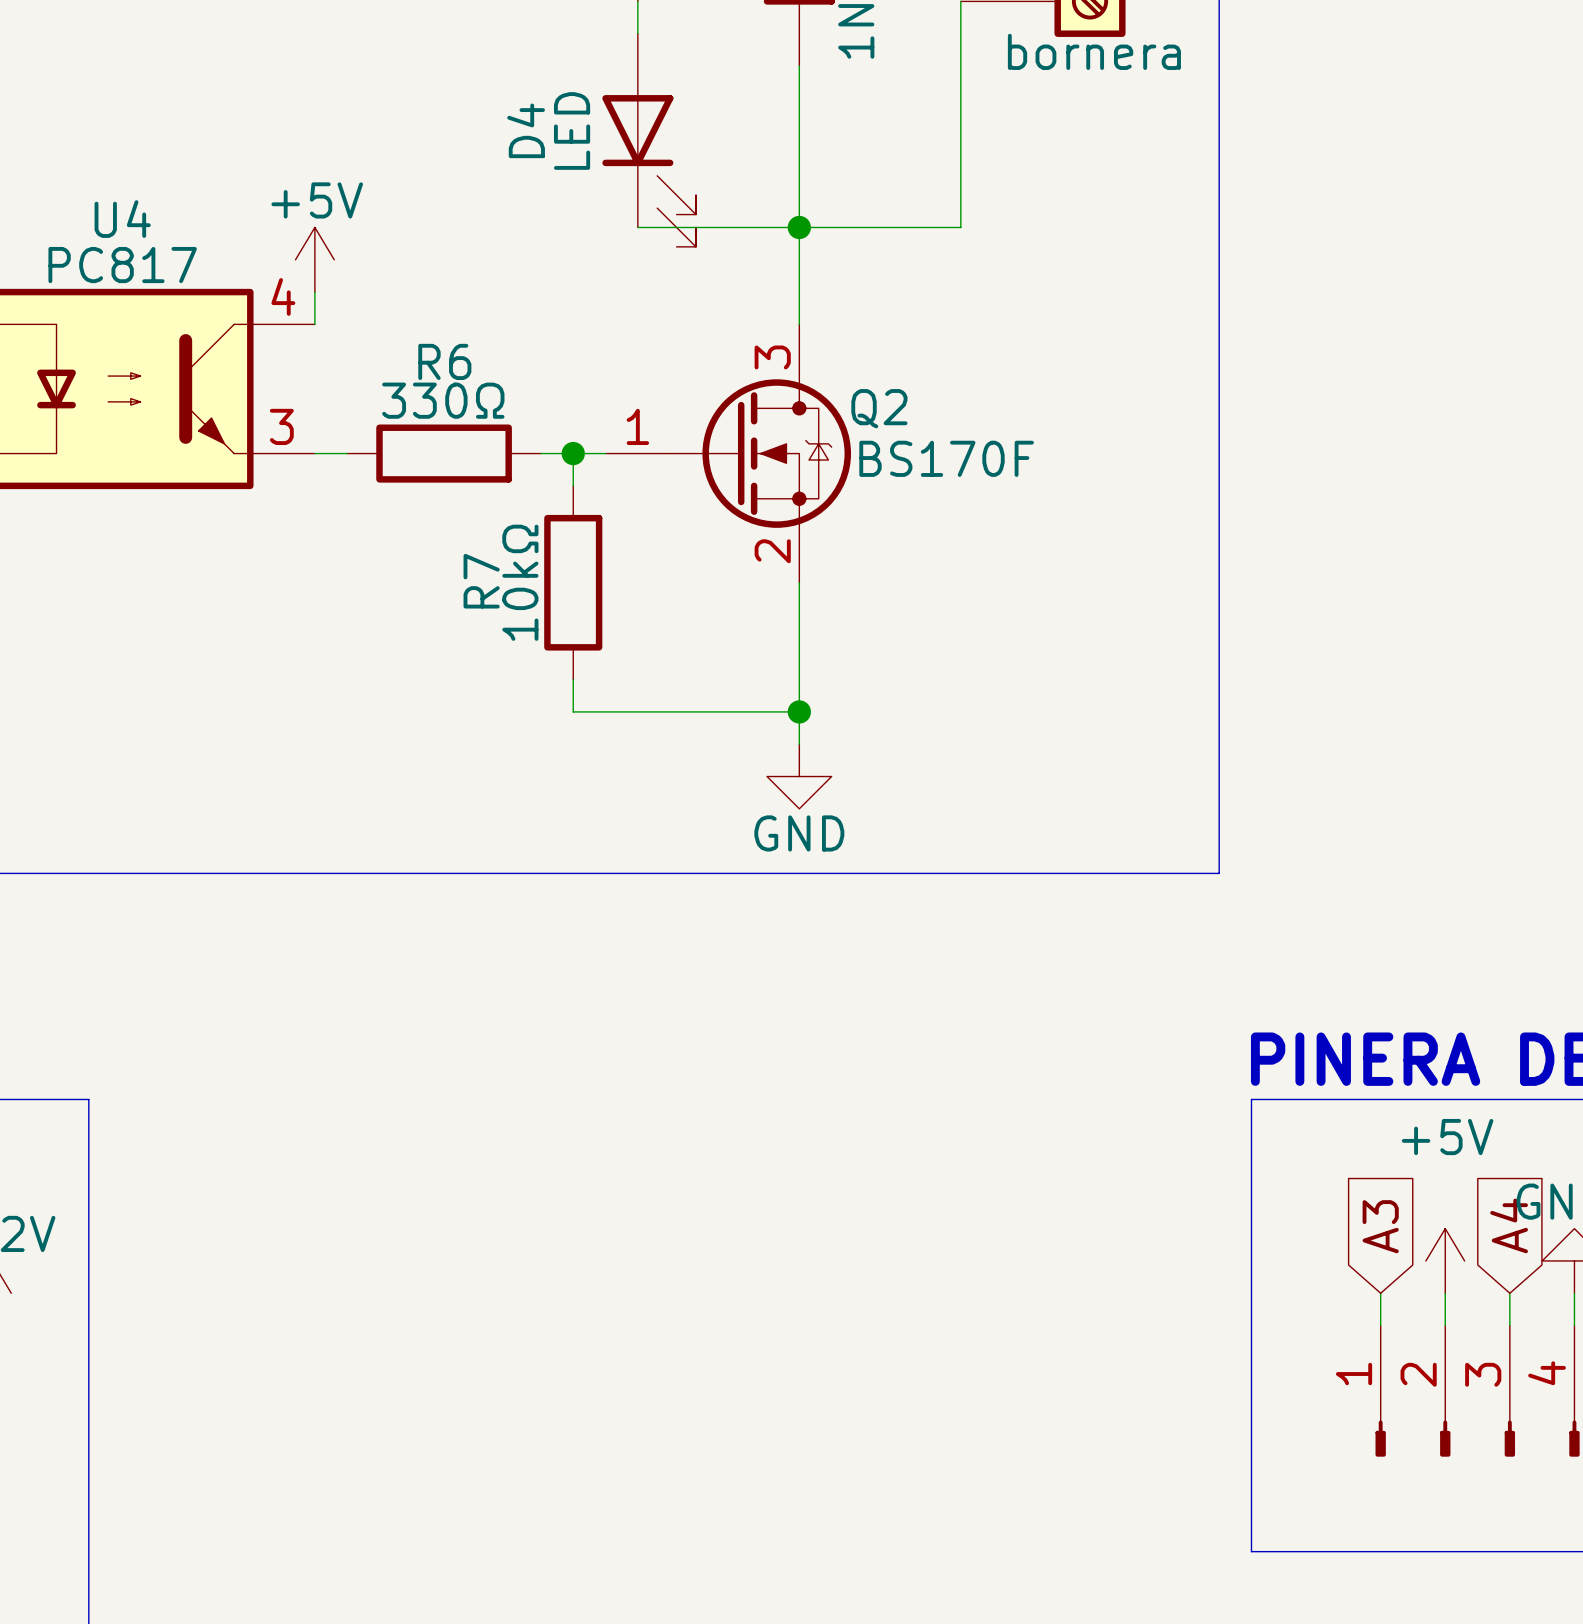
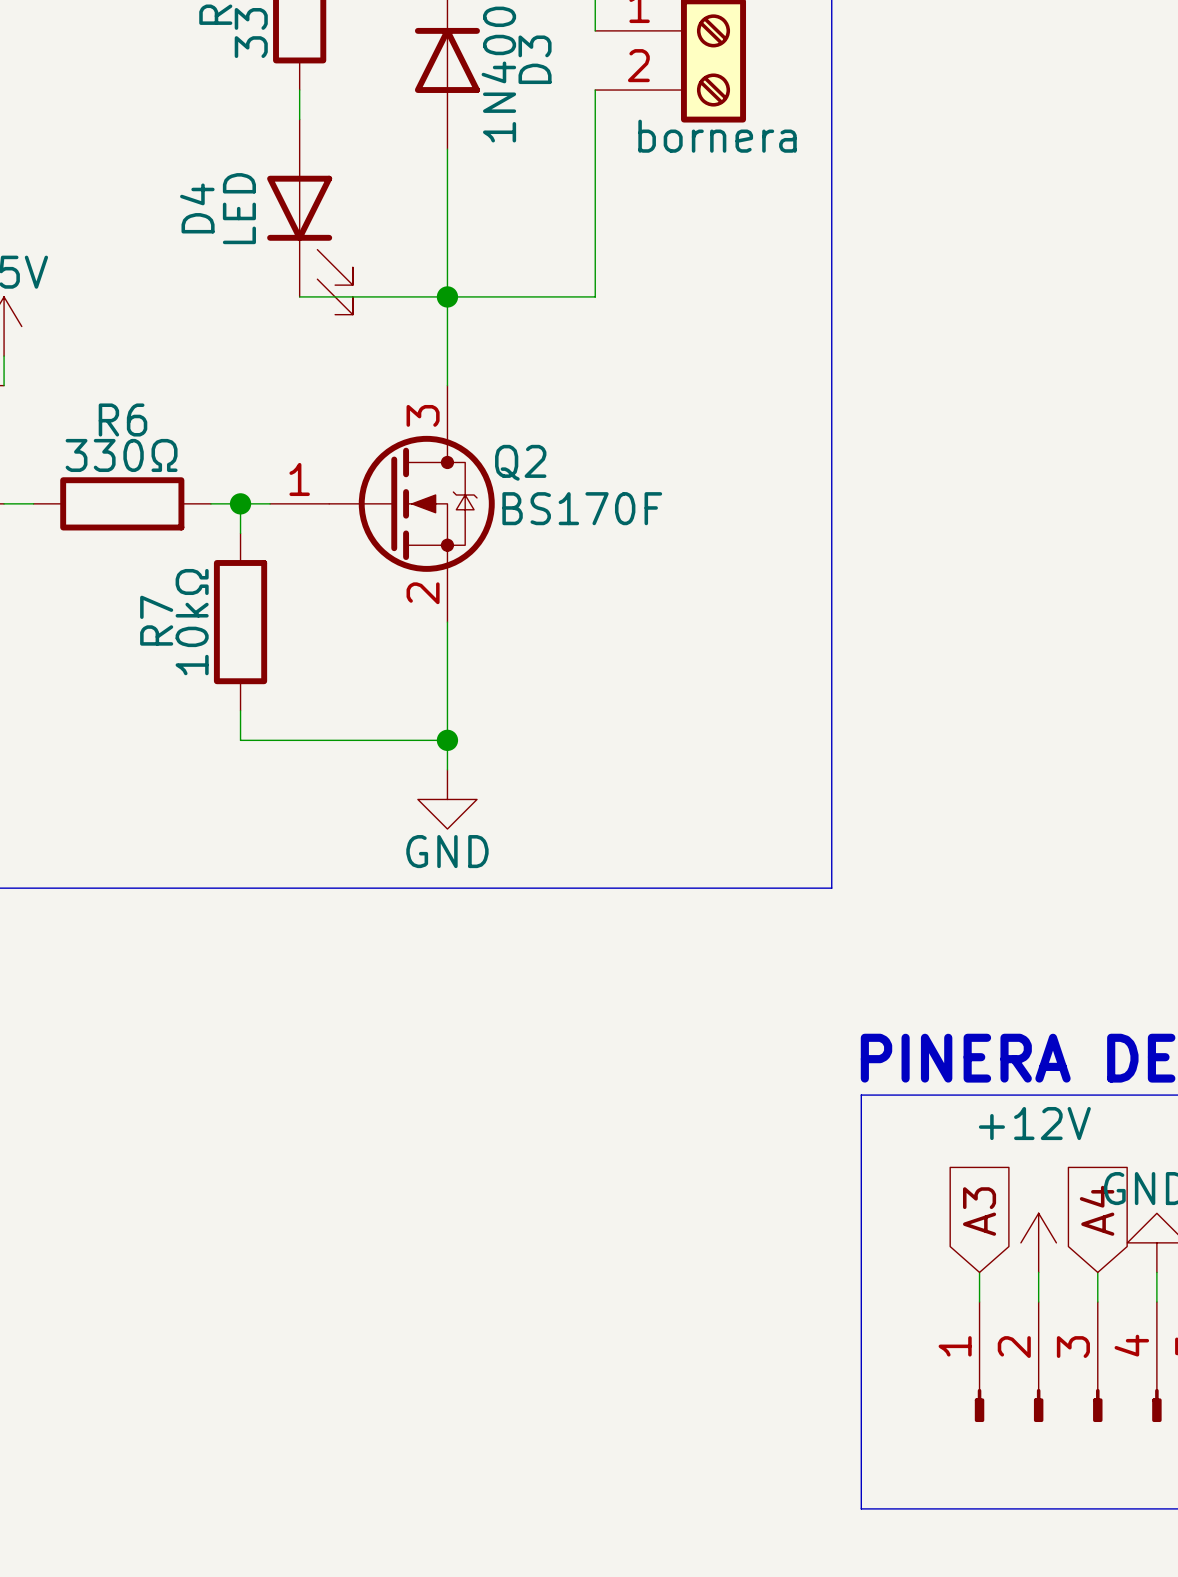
power symbol: +5V (1445, 1260) -> +12V (1038, 1242)

